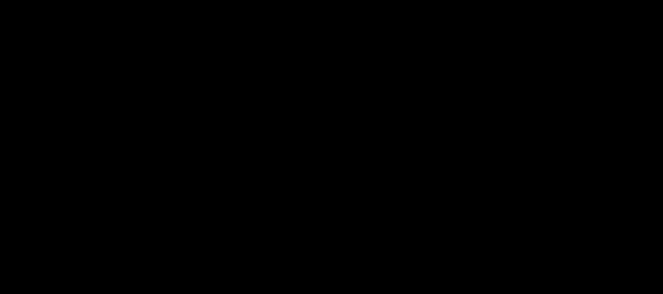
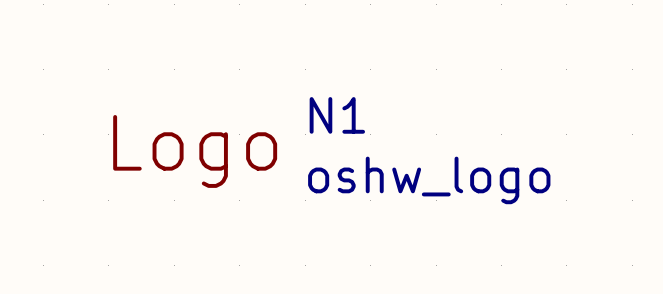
N1: none -> oshw_logo (331, 150)

